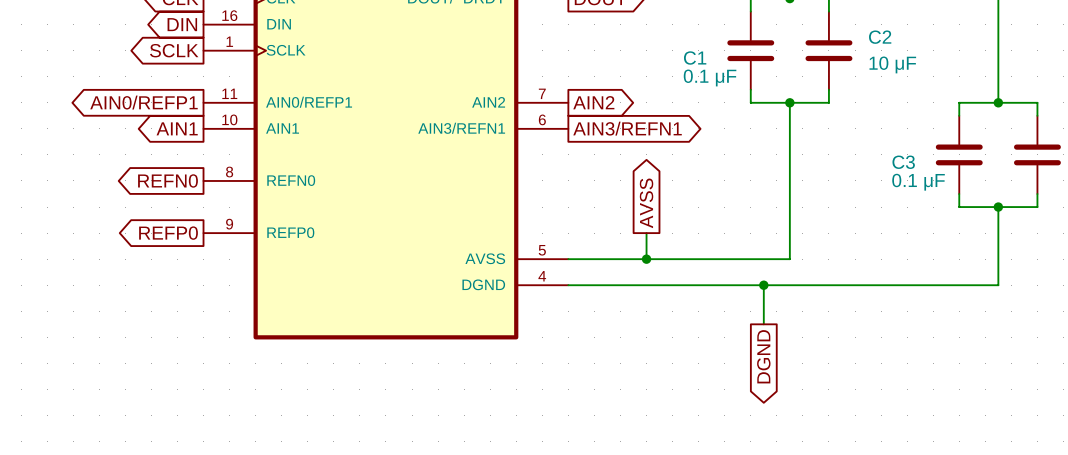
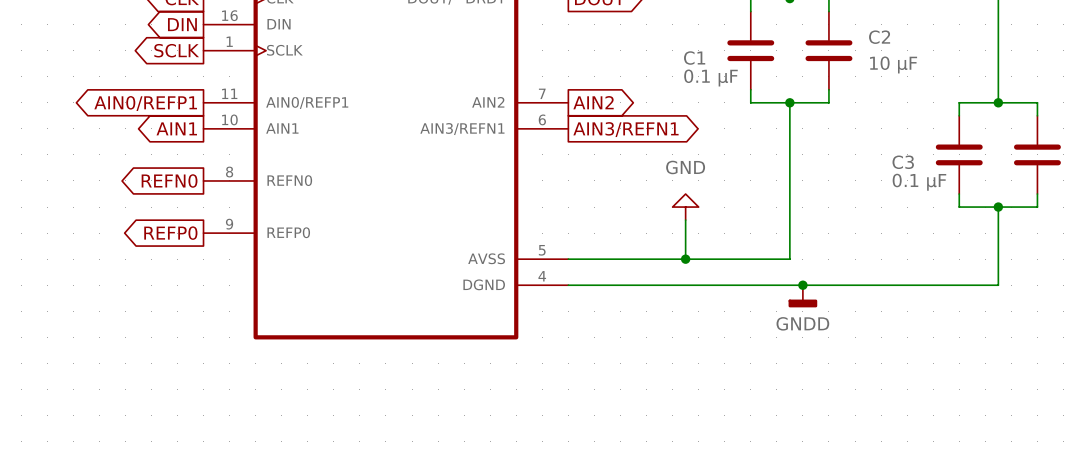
global label: AVSS (646, 203) -> none
power symbol: none -> GND (685, 207)
wire: (646, 233) (646, 259) -> none
junction position: (646, 259) -> (685, 259)
wire: (763, 285) (763, 324) -> (685, 220) (685, 259)
junction position: (763, 285) -> (802, 285)
power symbol: none -> GNDD (802, 296)
global label: DGND (763, 356) -> none

